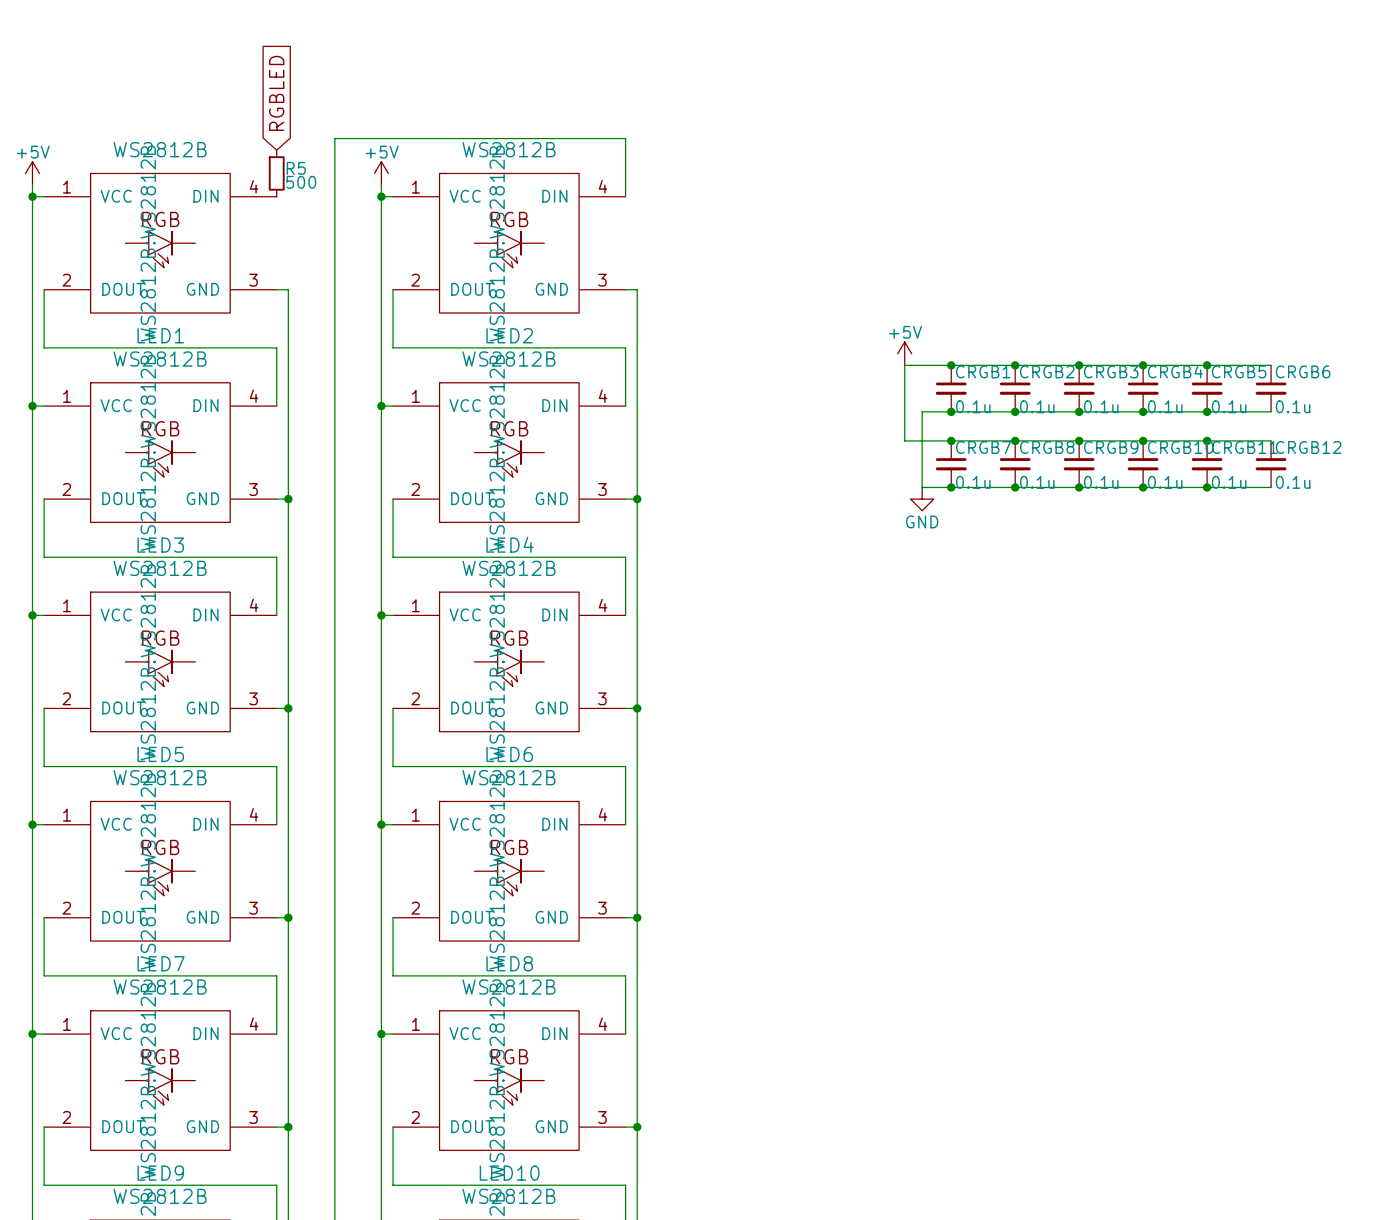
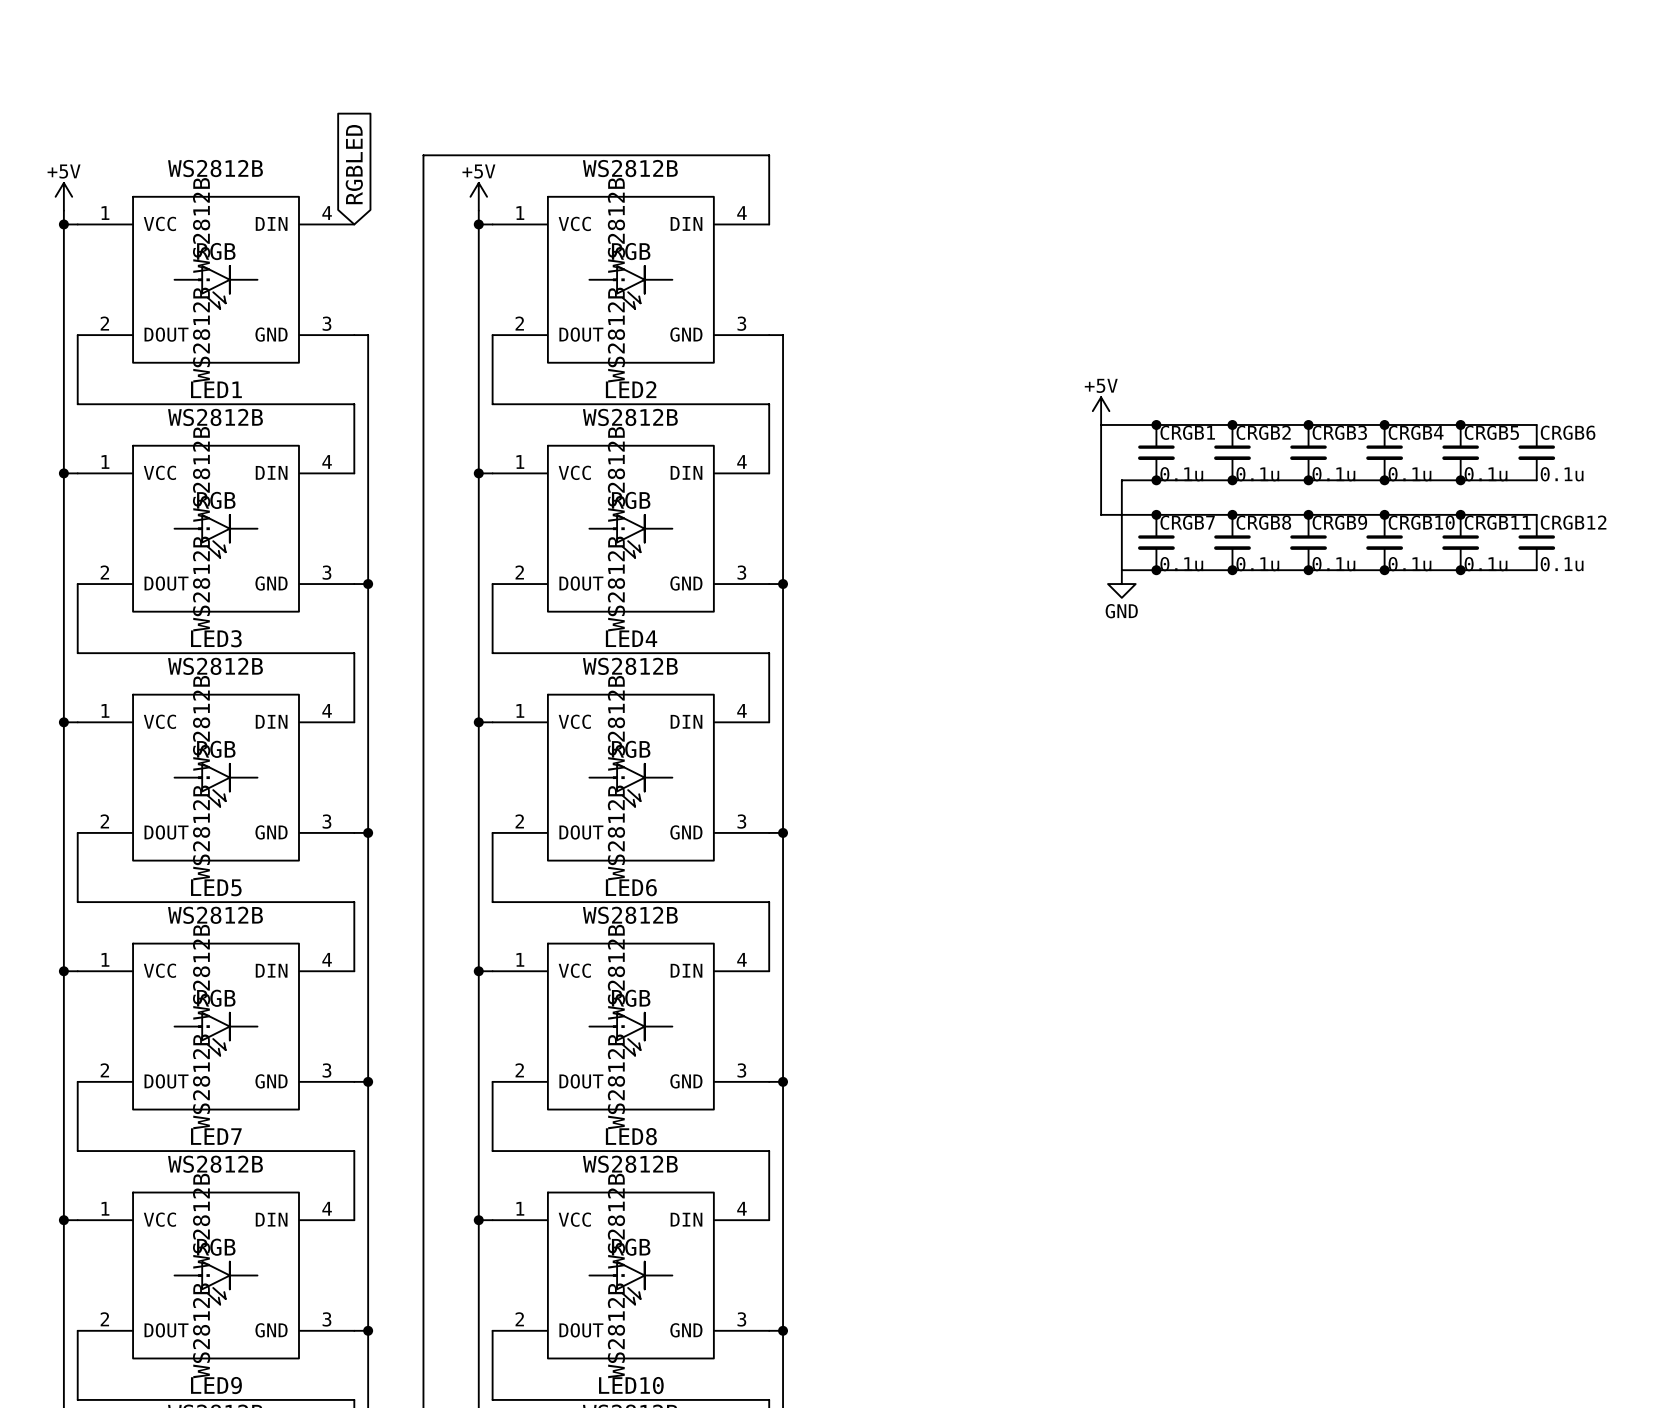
global label position: RGBLED (276, 93) -> RGBLED (354, 164)
R5: 500 (276, 173) -> none

